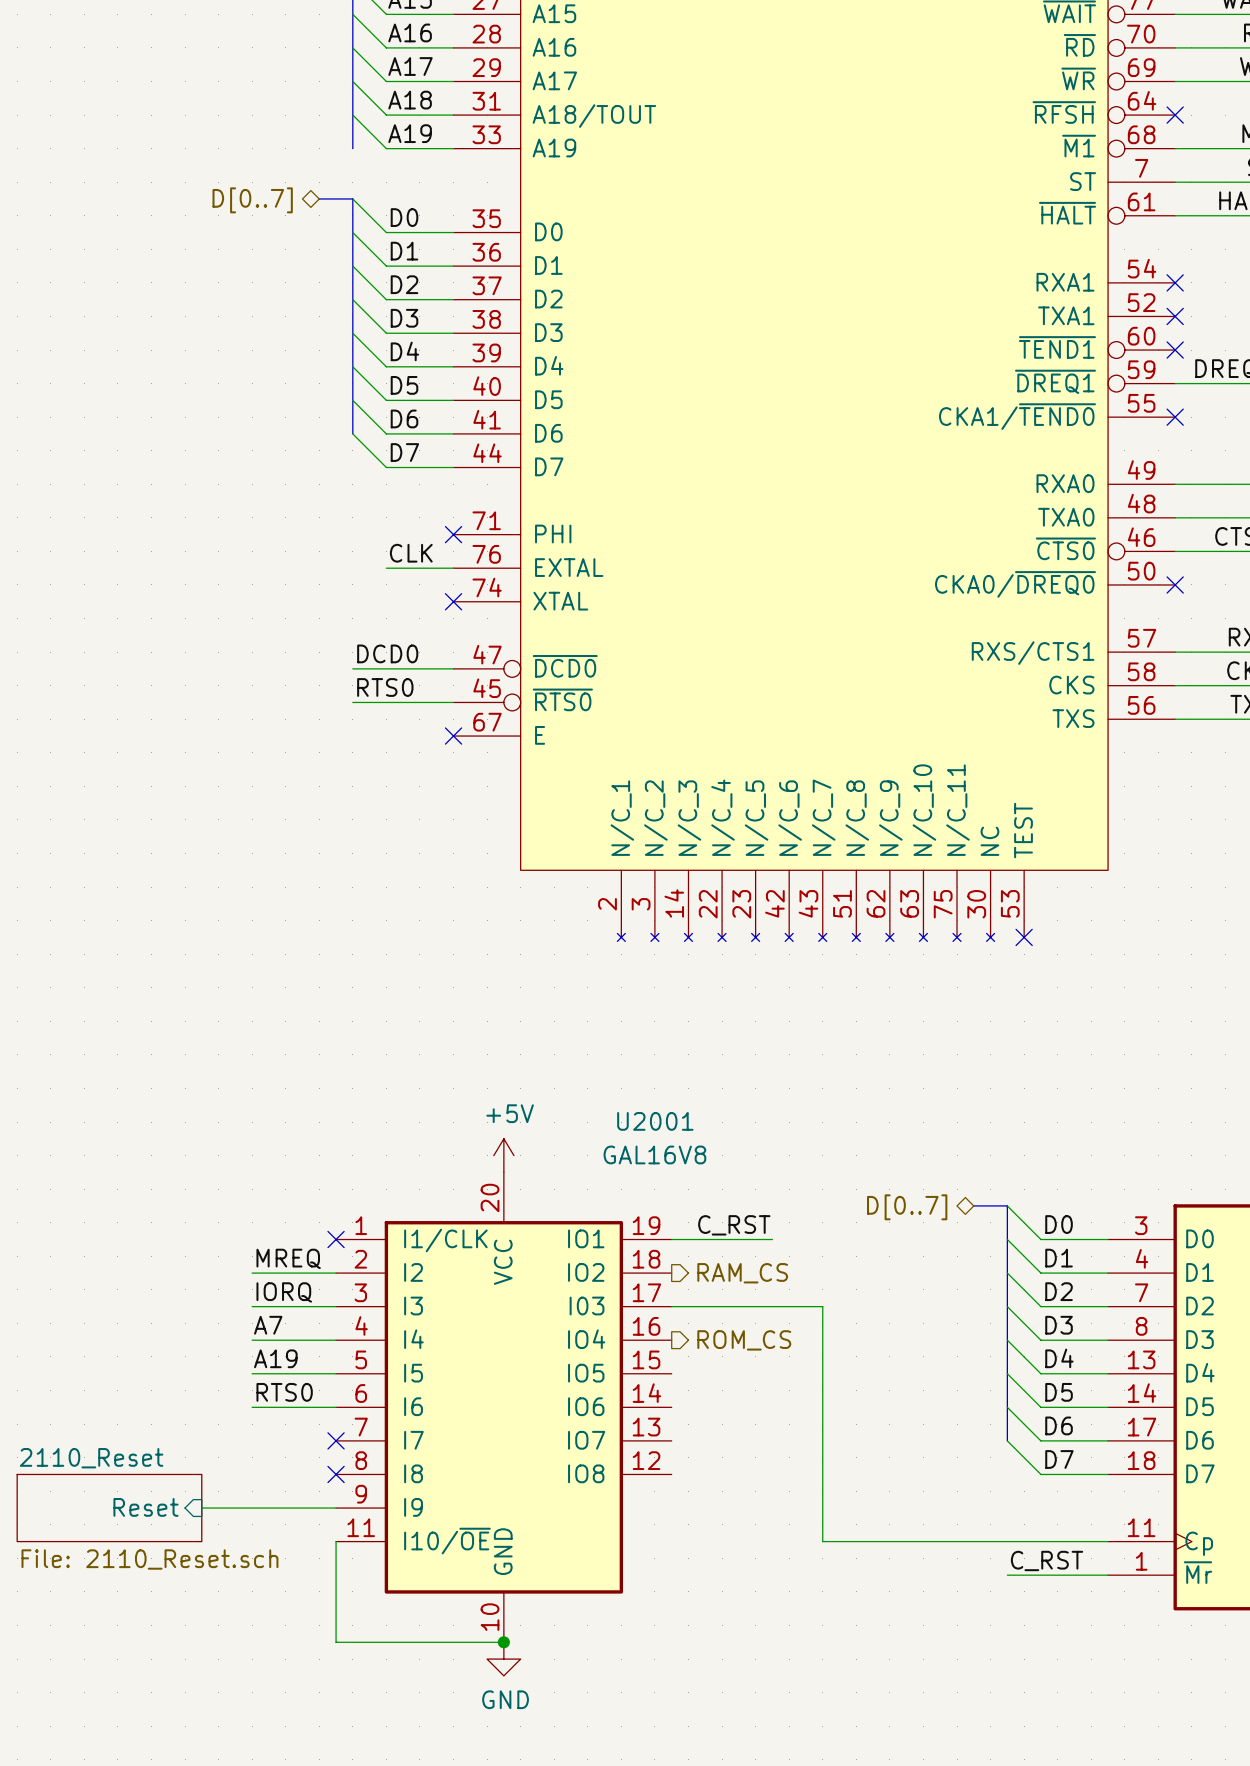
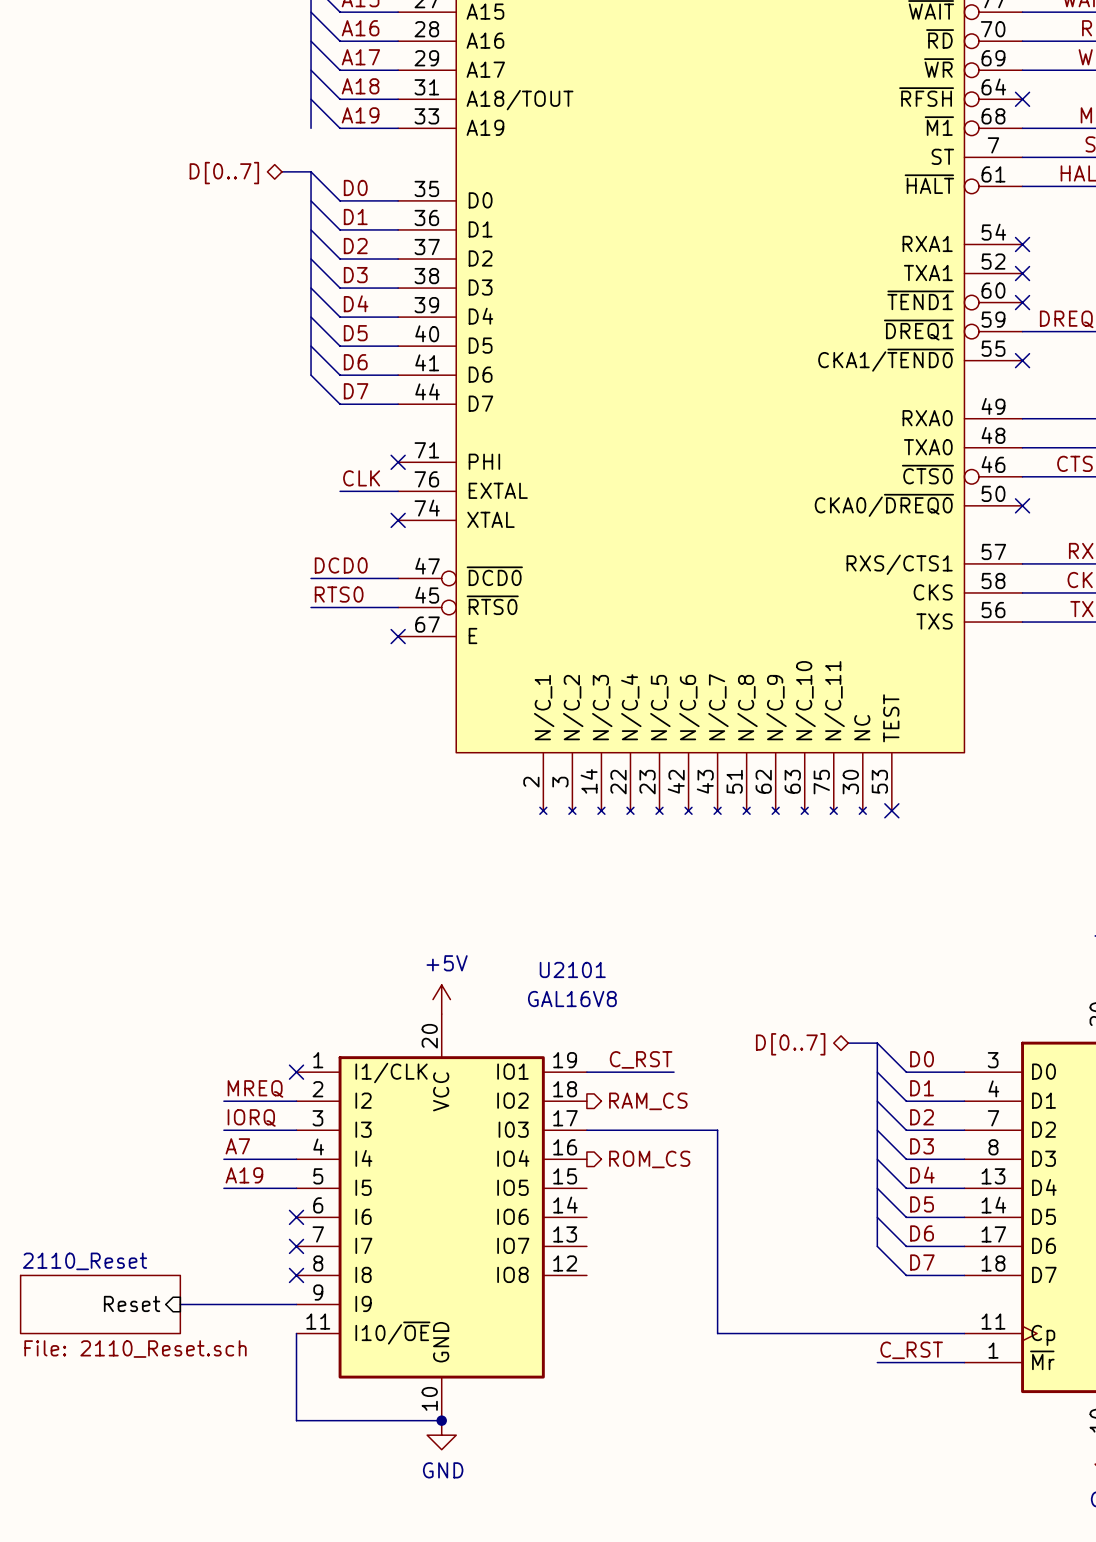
U2001 name: U2001 (655, 1121) -> U2101 (572, 969)
label: RTS0 (284, 1392) -> none
wire: (252, 1407) (336, 1407) -> none
no-connect mark: none -> (296, 1217)

